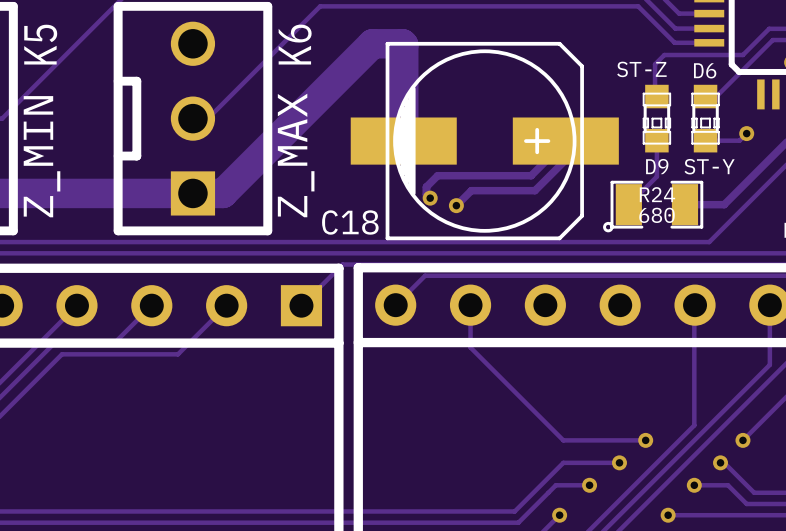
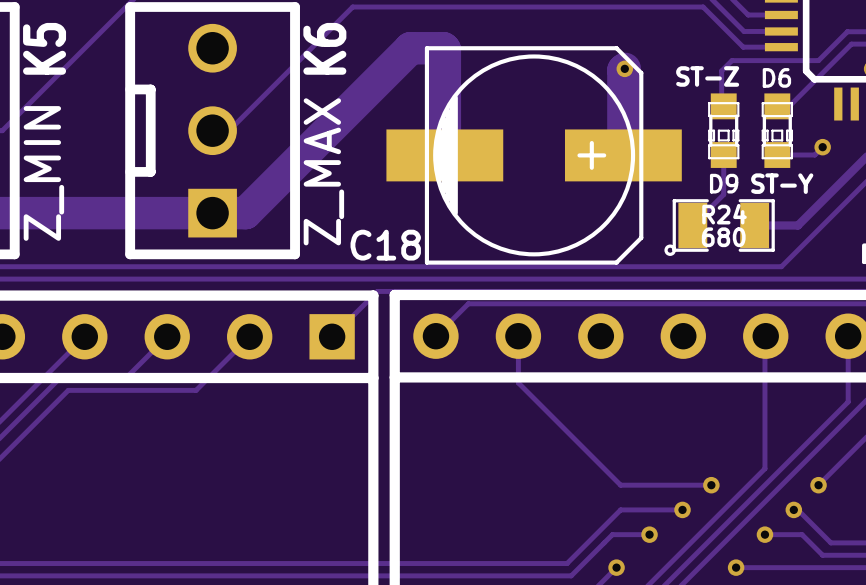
track: none -> (624, 68) (623, 155)
via: none -> (624, 68)
track: (426, 198) (426, 186) (437, 175) (531, 175) (565, 141) (565, 159) (534, 190) (471, 190) (456, 205) -> none
via: (430, 198) -> none
via: (456, 205) -> none

